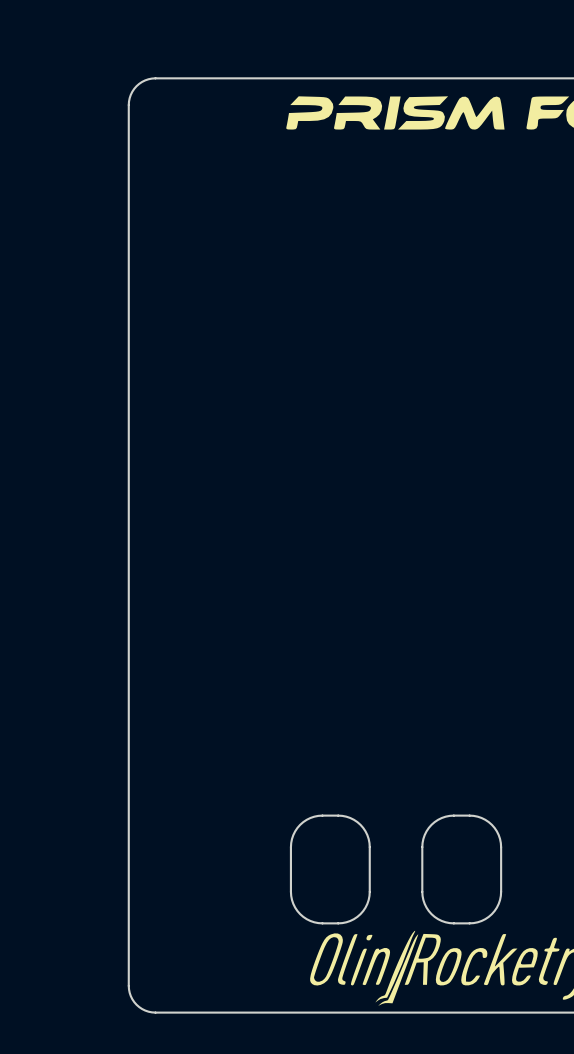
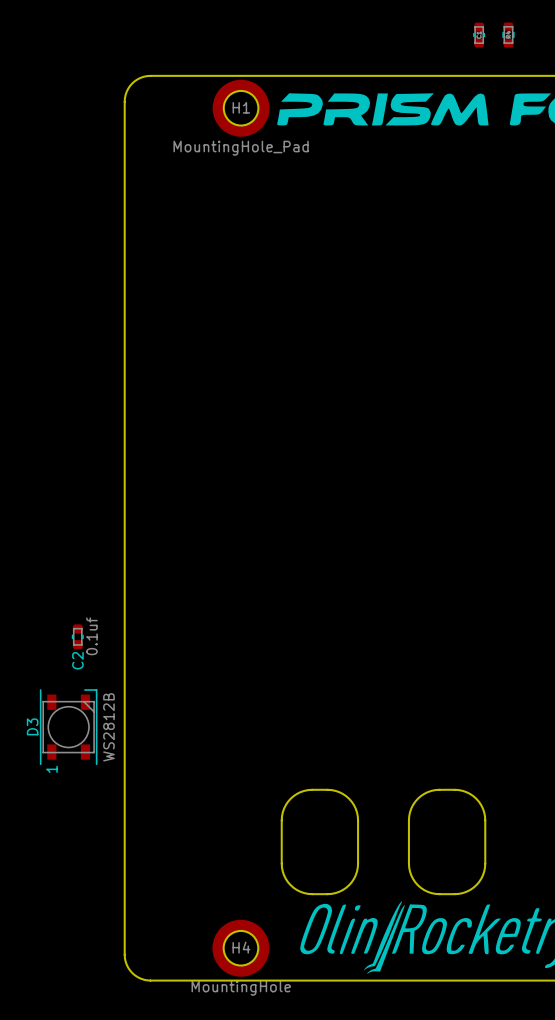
part: none -> (479, 35)
part: none -> (508, 34)
H1: none -> MountingHole_Pad (241, 108)
C2: none -> 0.1uf (77, 636)
D3: none -> WS2812B (68, 727)
H4: none -> MountingHole (240, 948)

